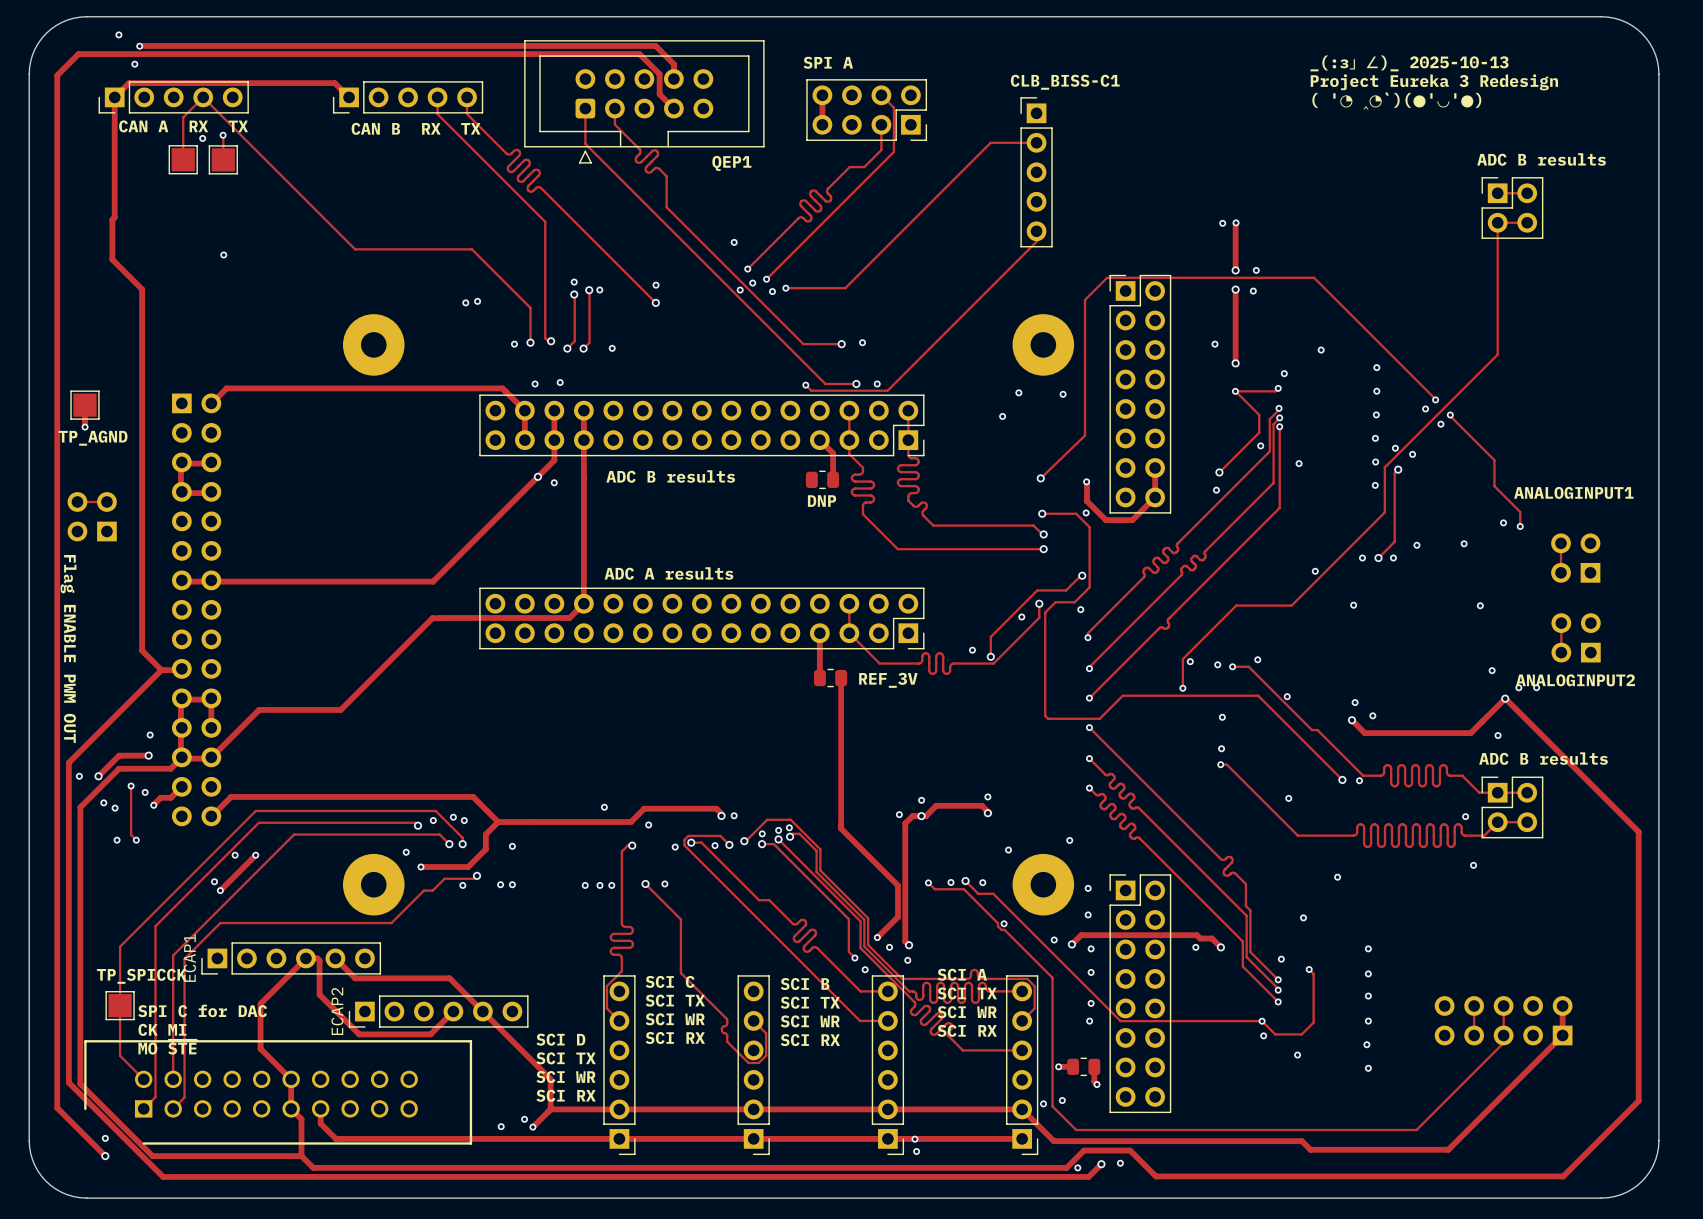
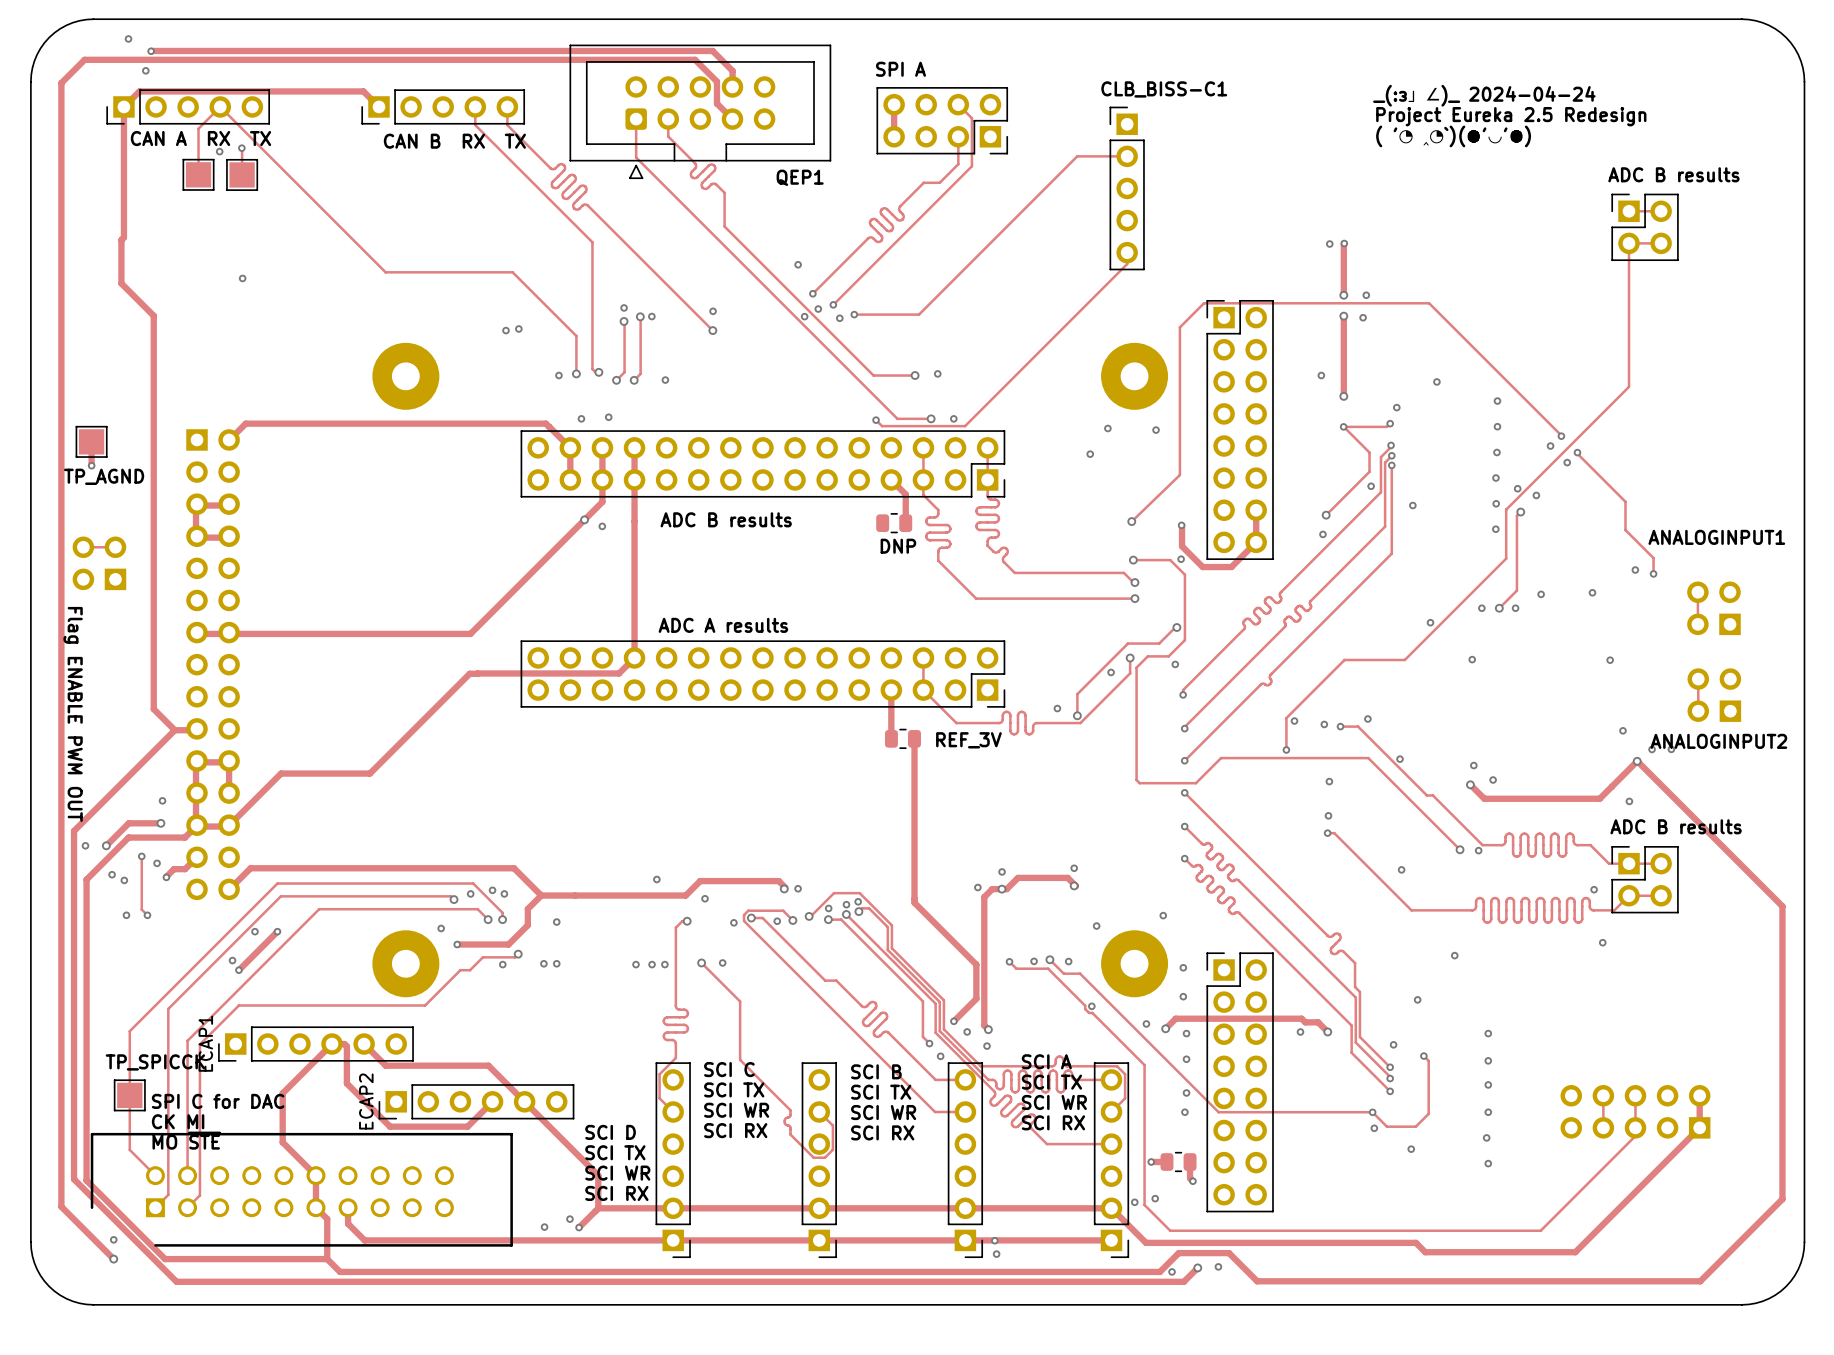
text: _(:з」∠)_ 2025-10-13 (1409, 63) -> _(:з」∠)_ 2024-04-24 (1484, 95)
text: Project Eureka 3 Redesign (1434, 82) -> Project Eureka 2.5 Redesign (1511, 116)
text position: ( '◔︎ ‸◔︎`)(●'◡'●) (1396, 100) -> ( '◔︎ ‸◔︎`)(●'◡'●) (1453, 136)

